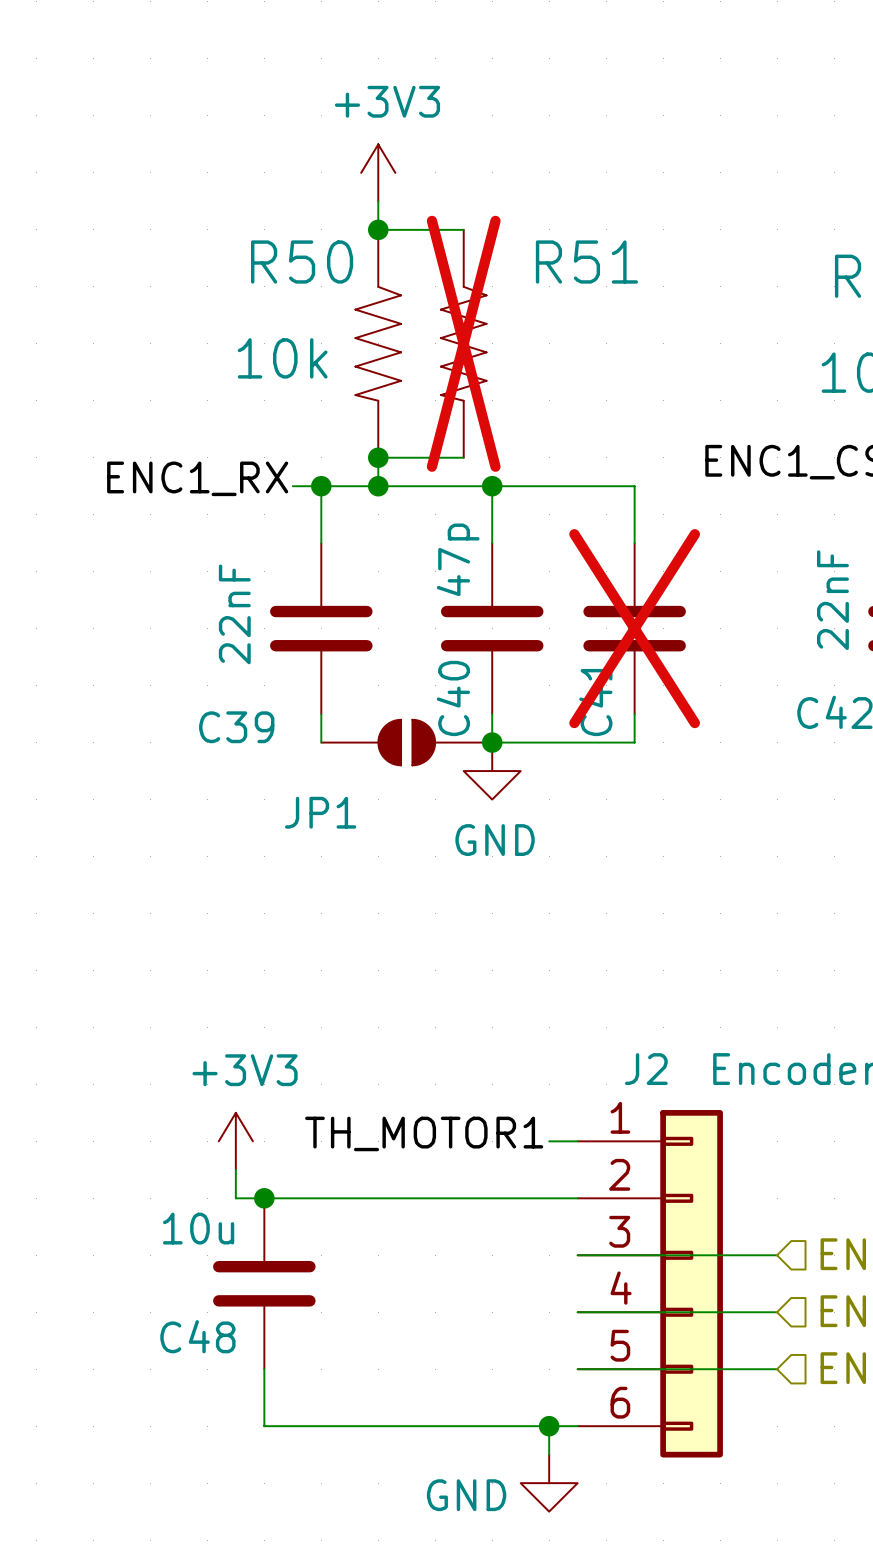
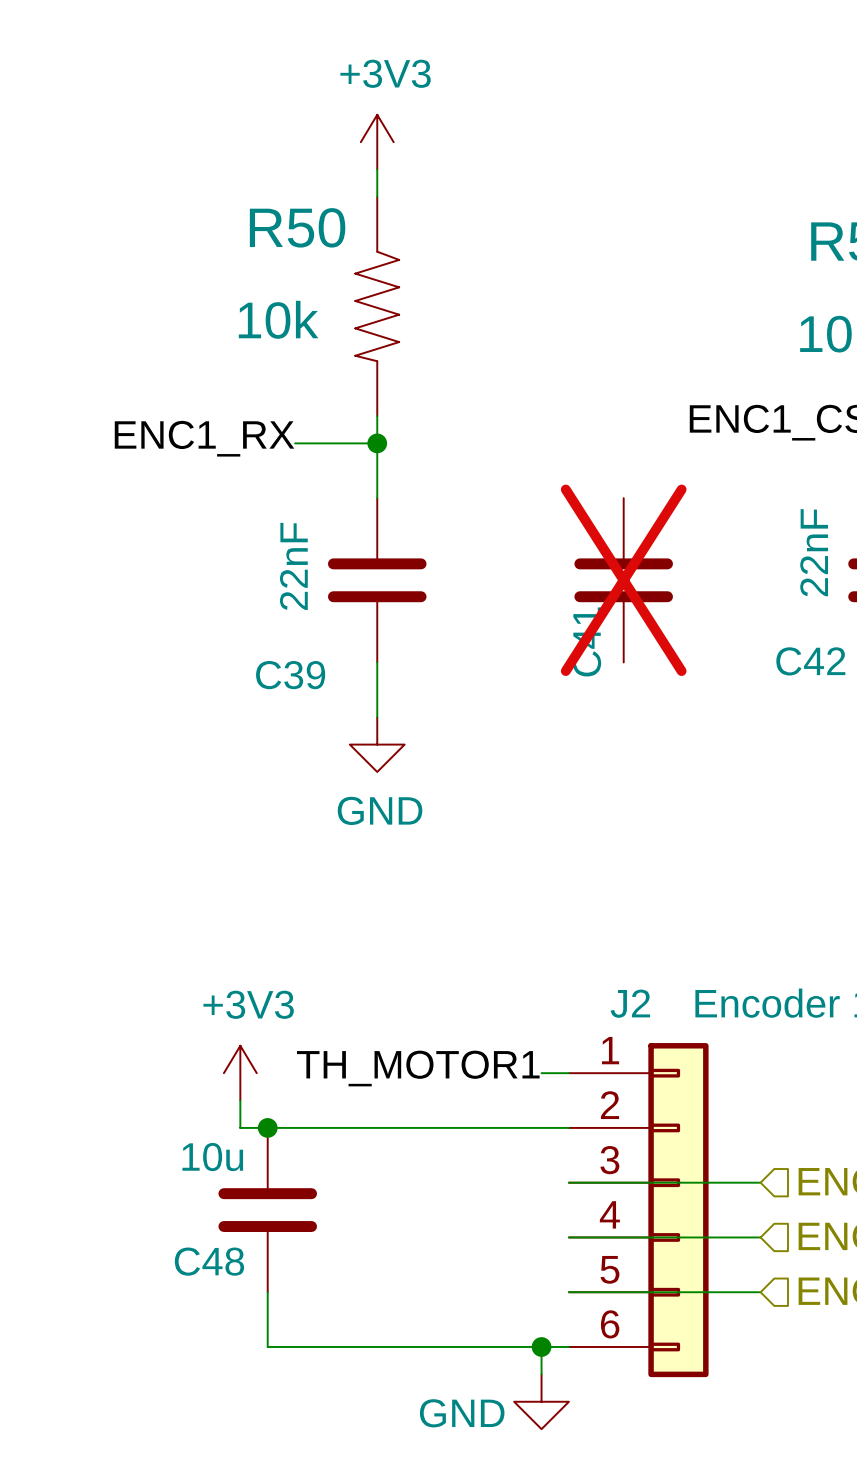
wire: (378, 229) (463, 229) -> none
junction: (378, 229) -> none
R51: (463, 343) -> none
wire: (378, 457) (463, 457) -> none
junction: (378, 457) -> none
wire: (321, 486) (321, 543) -> (377, 662) (377, 717)
junction: (321, 486) -> none
wire: (378, 486) (634, 486) (634, 543) -> (377, 443) (377, 498)
wire: (492, 486) (492, 543) -> none
junction: (492, 486) -> none
C39 position: (321, 628) -> (377, 580)
C40: 47p (492, 628) -> none
wire: (321, 714) (321, 742) -> none
wire: (492, 714) (492, 742) (634, 742) (634, 714) -> none
JP1: (406, 742) -> none
junction: (492, 742) -> none
power symbol position: GND (492, 771) -> GND (377, 744)

